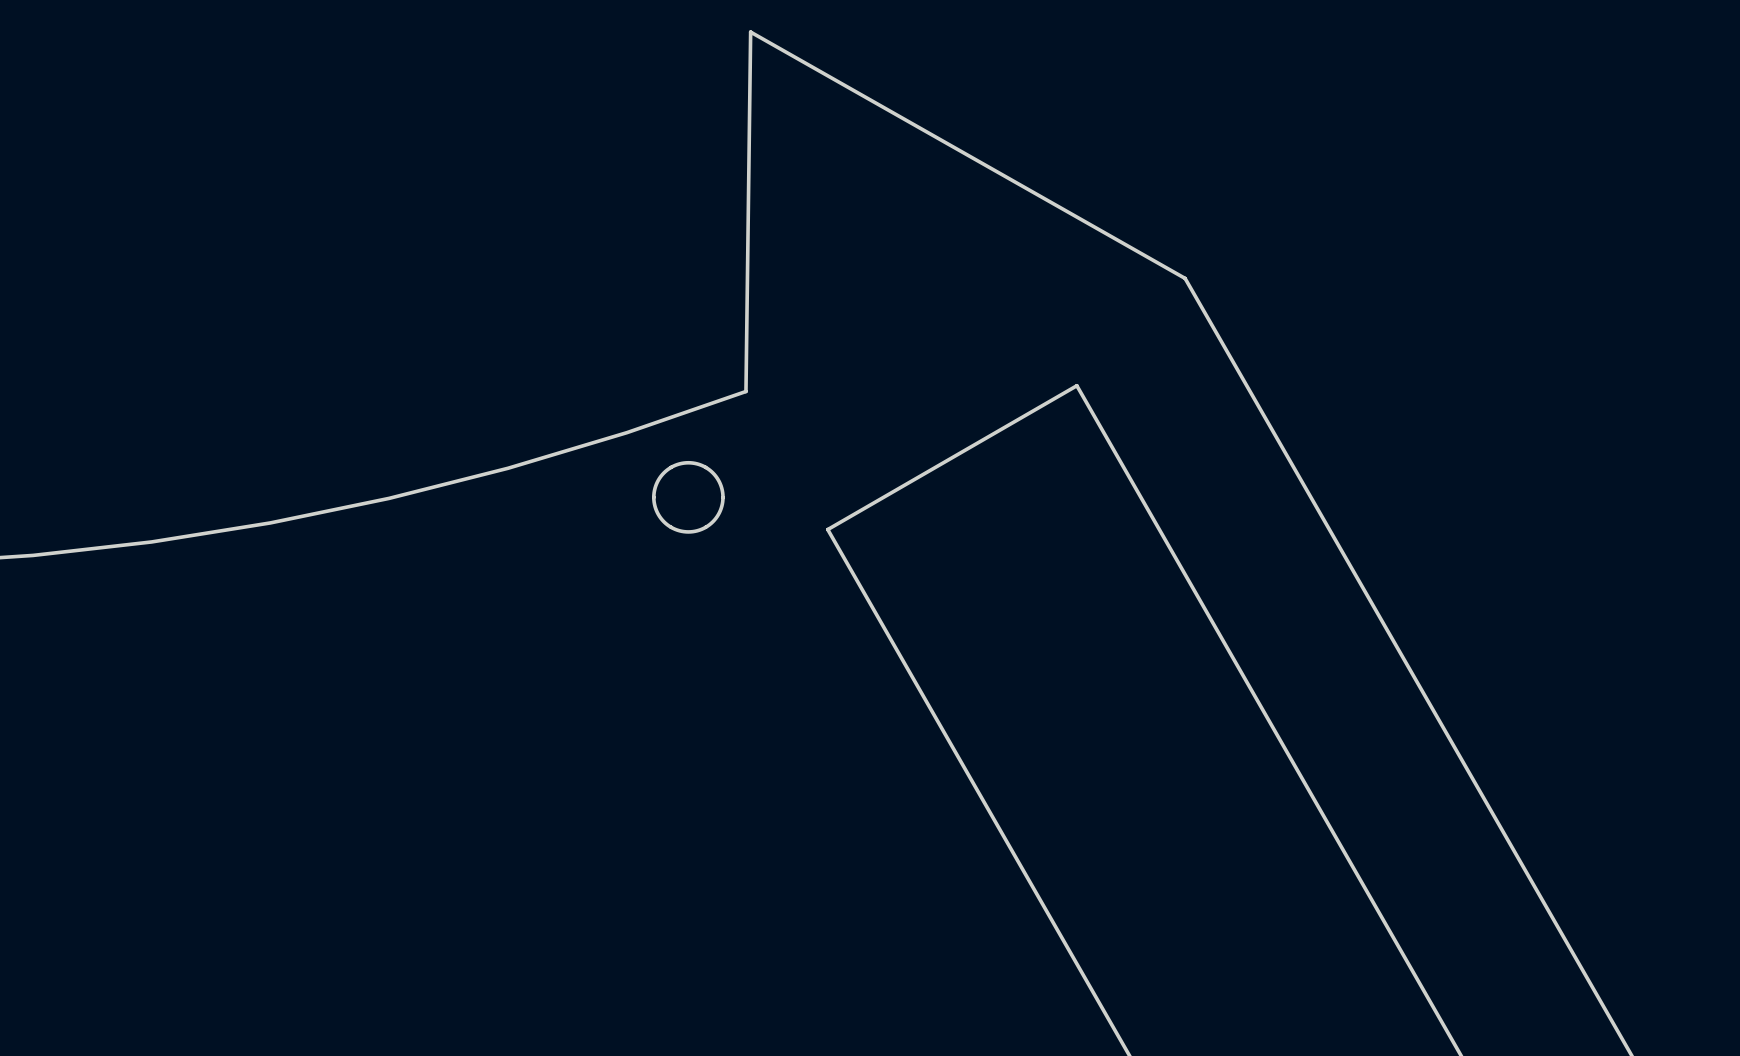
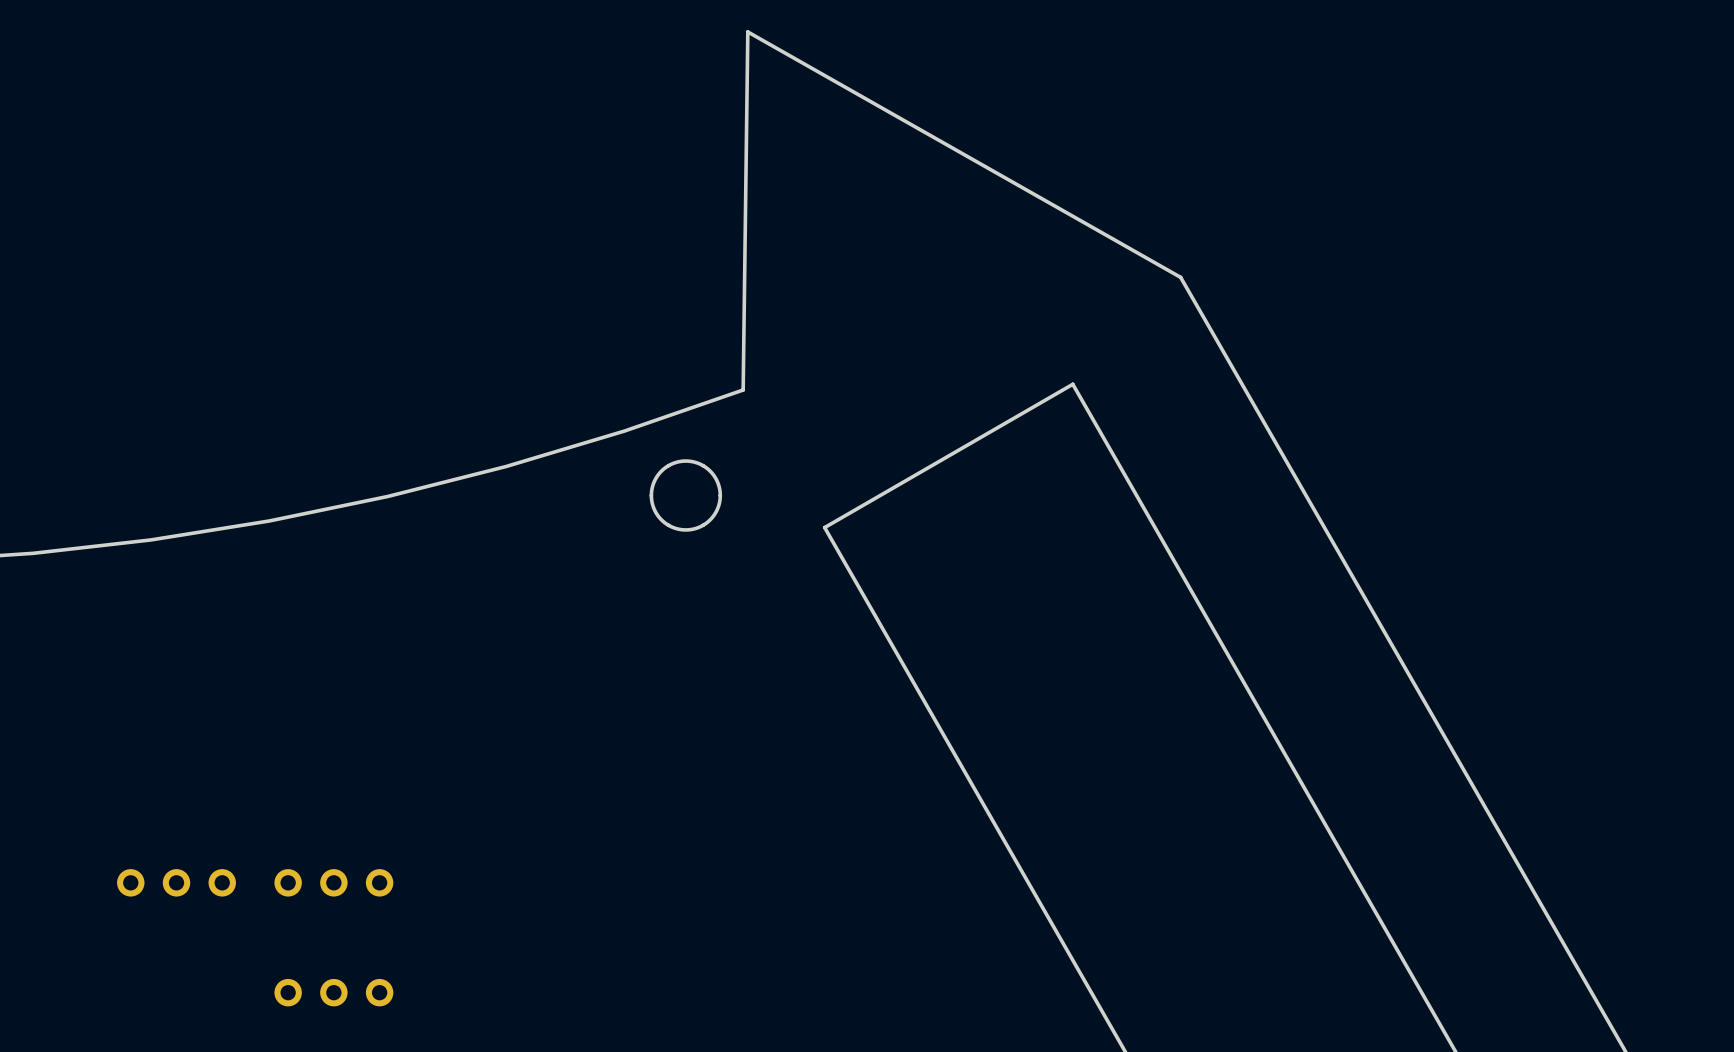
part: none -> (176, 882)
part: none -> (333, 882)
part: none -> (333, 992)

